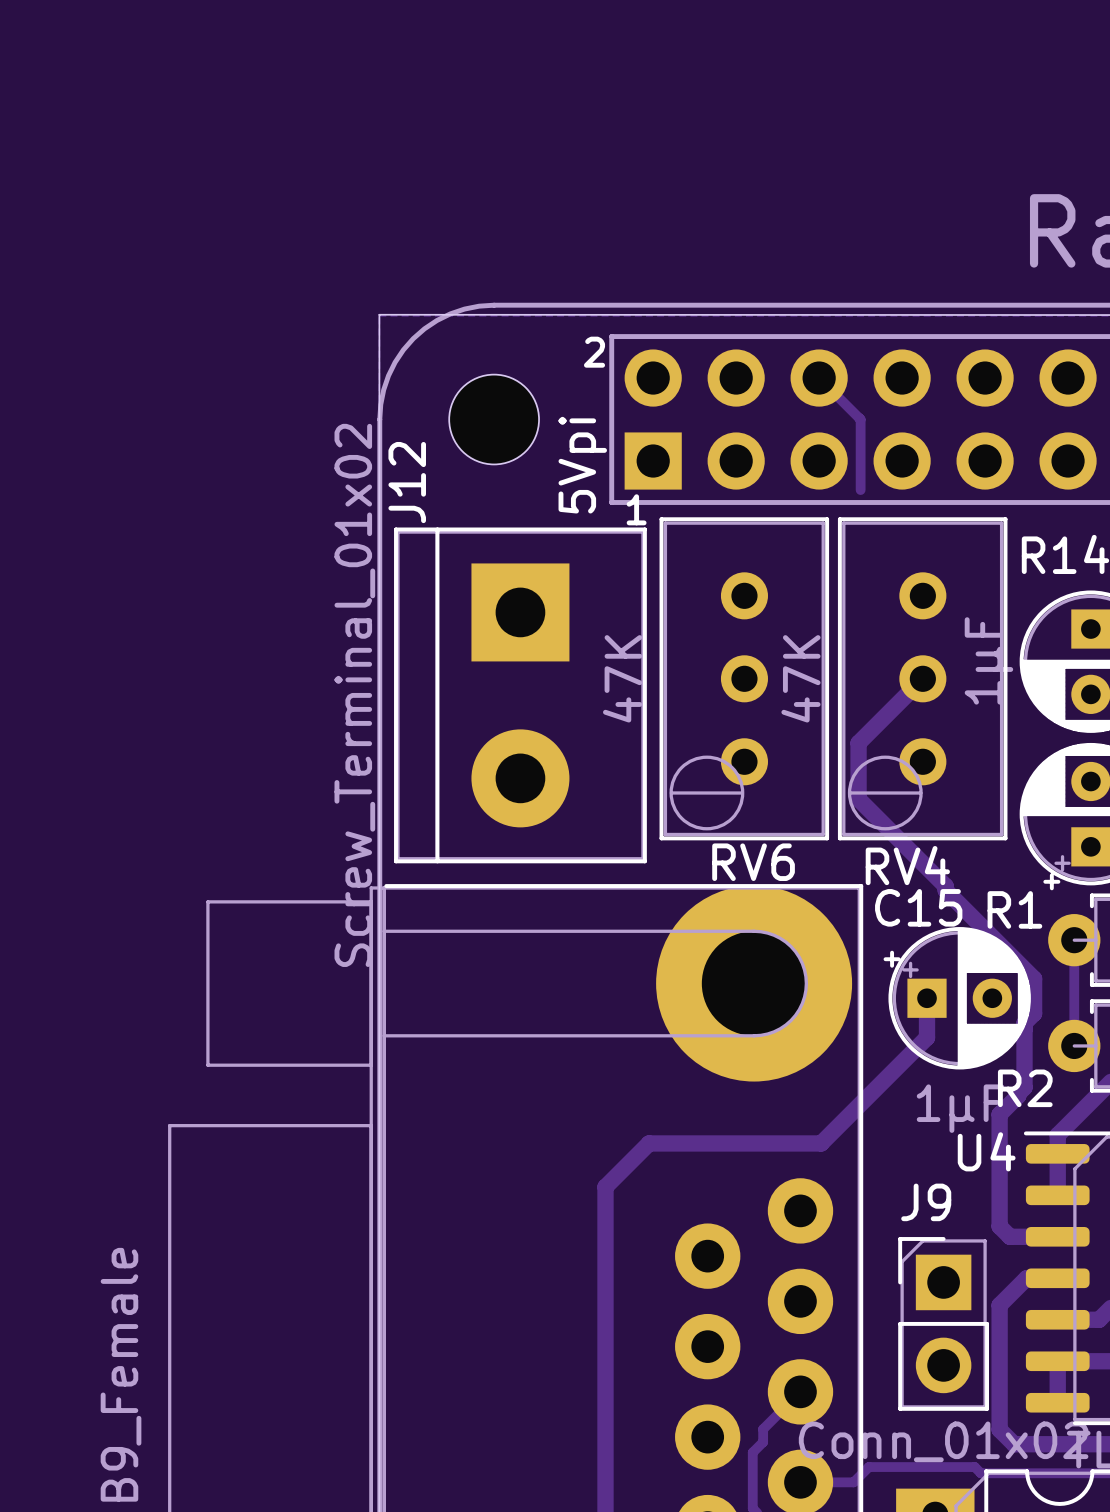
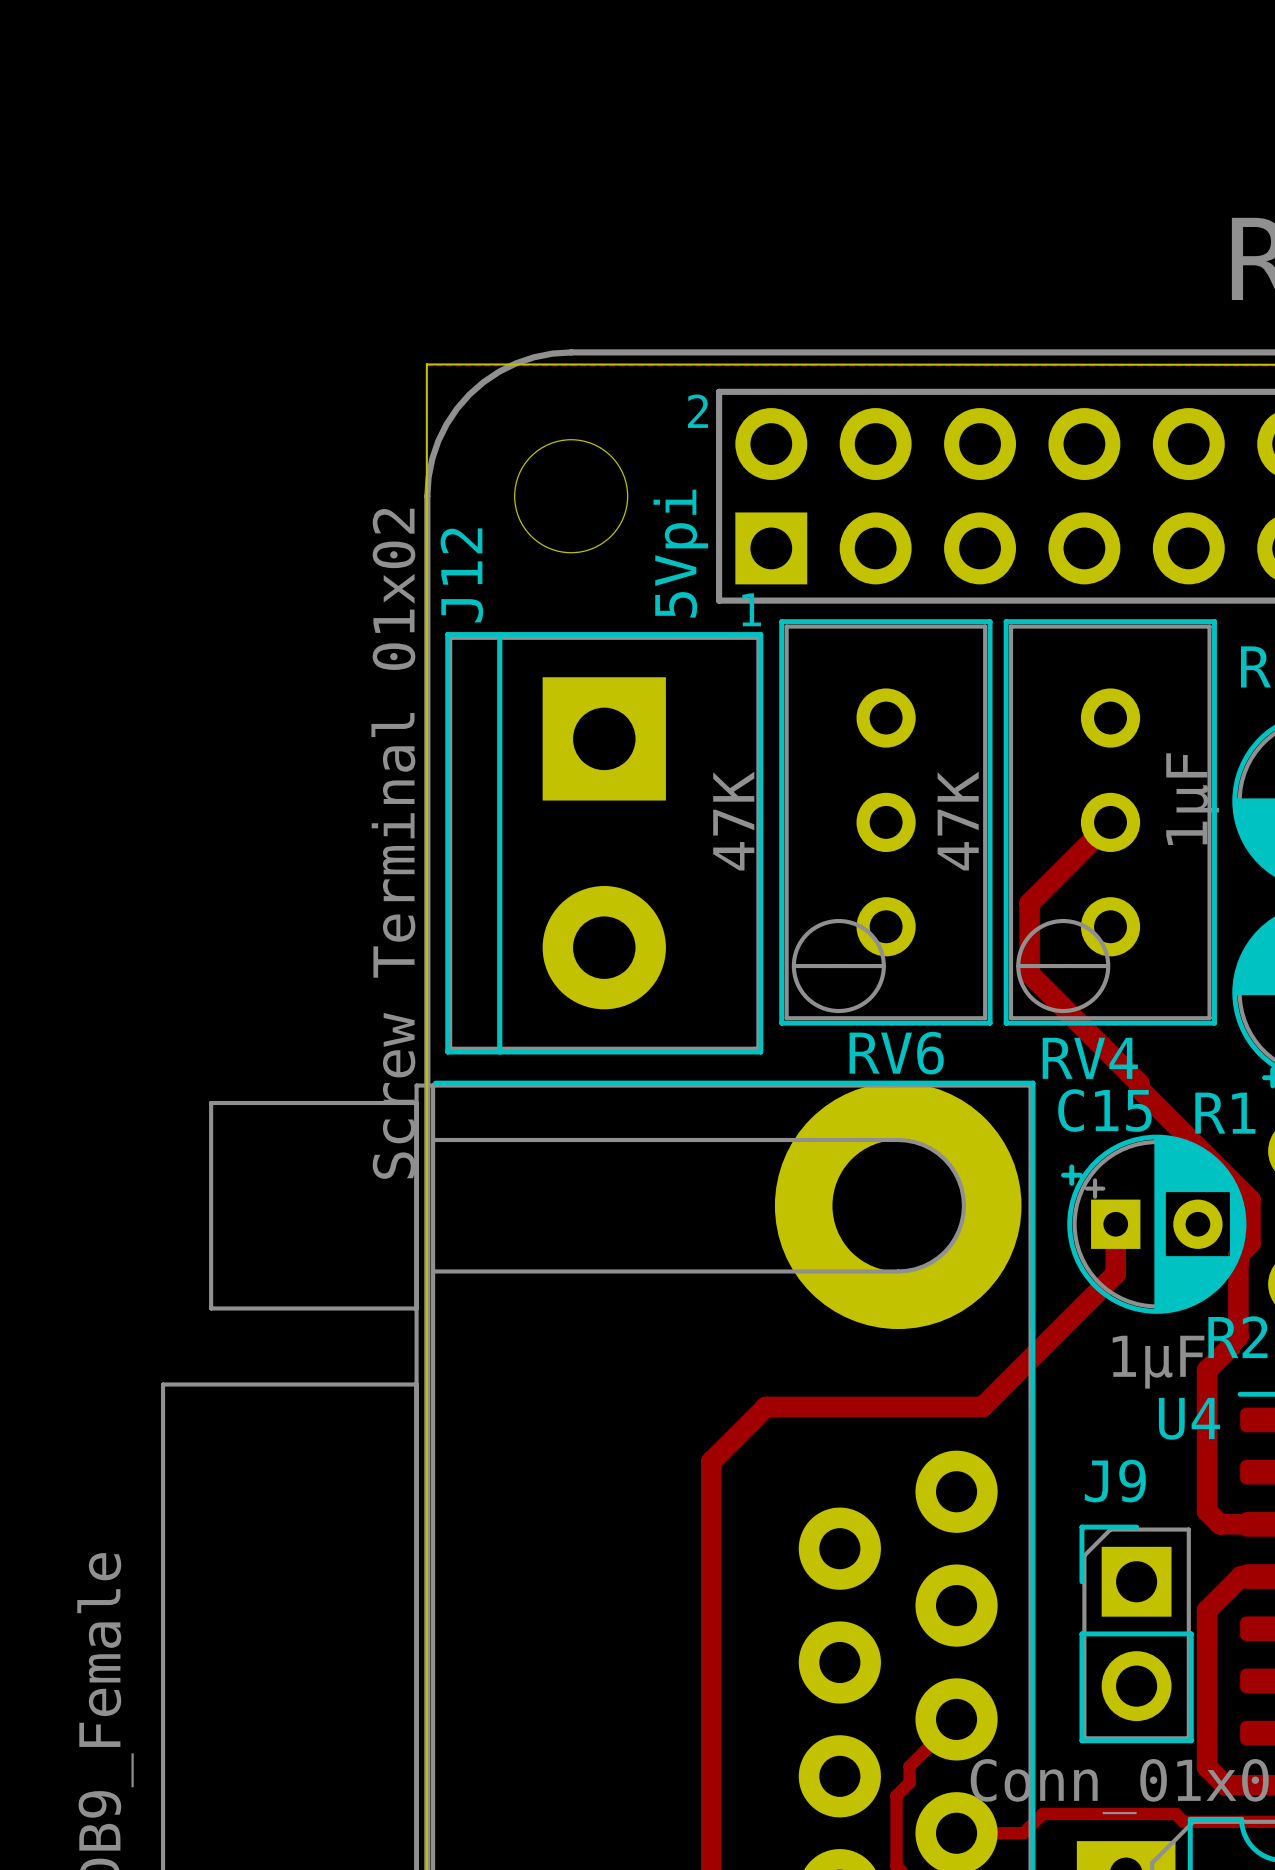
track: (819, 378) (860, 419) (860, 490) -> none

